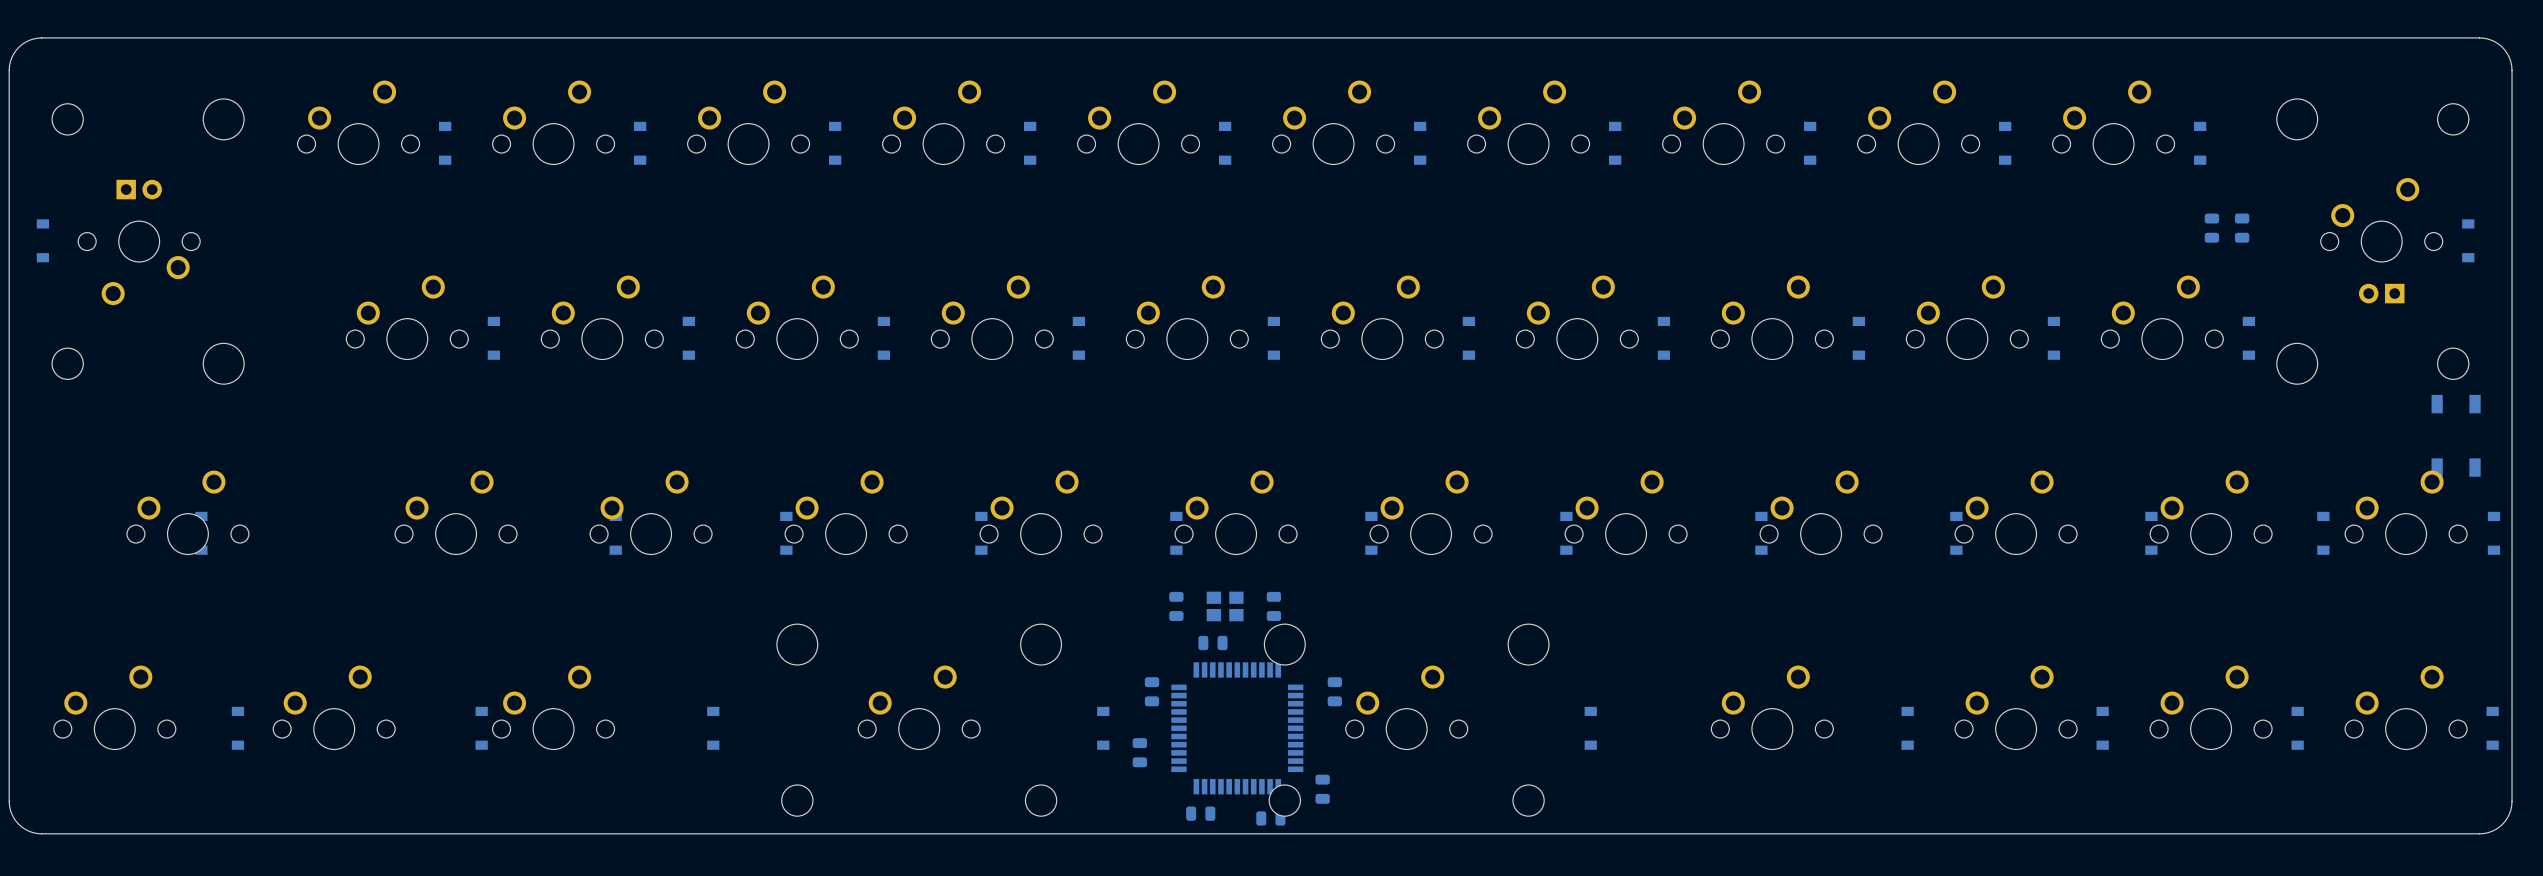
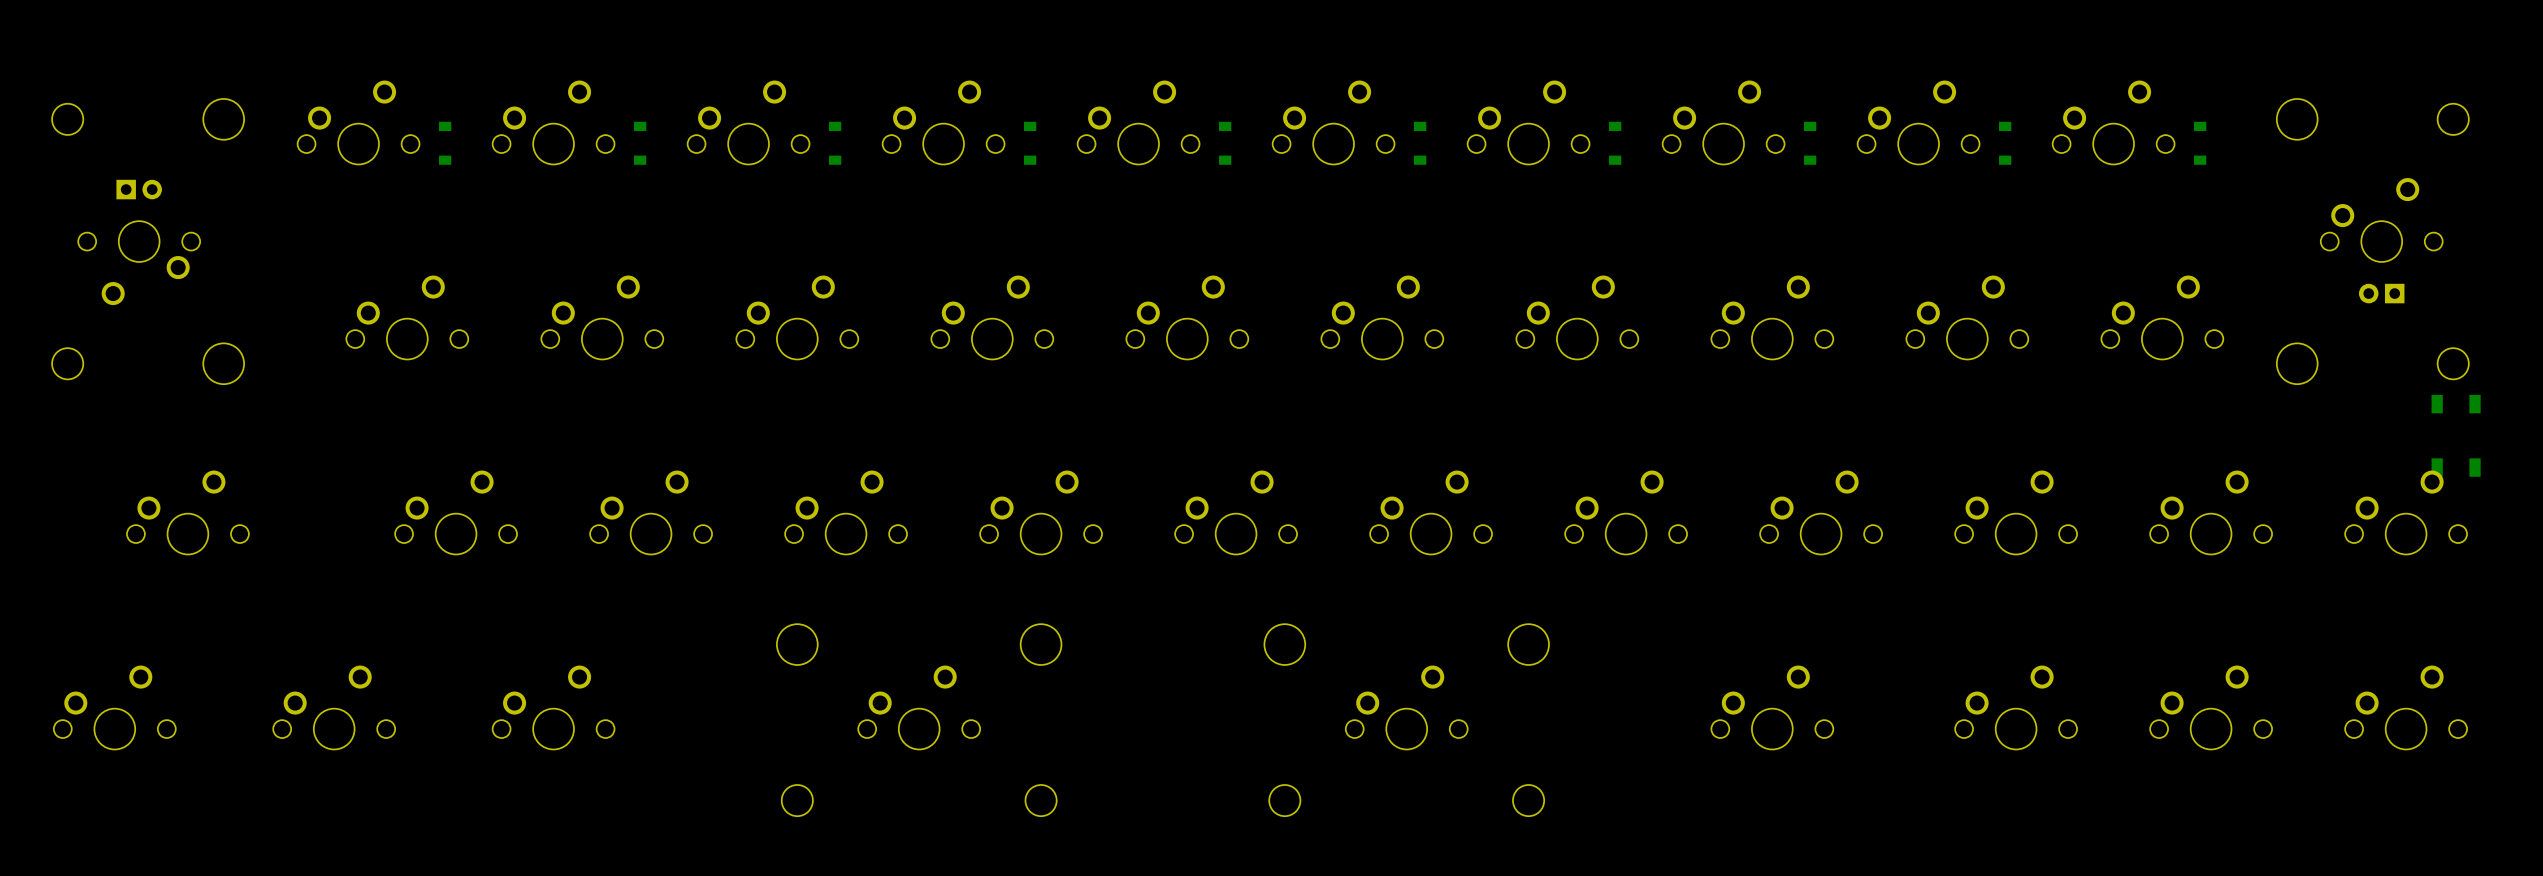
board edge: (41, 37) (29, 40) (18, 47) (11, 57) (9, 70) (9, 801) (11, 813) (15, 821) (21, 827) (33, 832) (2479, 833) (2487, 832) (2499, 827) (2507, 817) (2510, 809) (2512, 70) (2509, 57) (2505, 50) (2495, 42) (2487, 39) (41, 37) -> none
part: (2211, 228) -> none
part: (2242, 228) -> none
part: (42, 240) -> none
part: (2468, 240) -> none
part: (493, 338) -> none
part: (688, 338) -> none
part: (883, 338) -> none
part: (1078, 338) -> none
part: (1273, 338) -> none
part: (1468, 338) -> none
part: (1663, 338) -> none
part: (1858, 338) -> none
part: (2053, 338) -> none
part: (2248, 338) -> none
part: (201, 533) -> none
part: (615, 533) -> none
part: (786, 533) -> none
part: (981, 533) -> none
part: (1176, 533) -> none
part: (1371, 533) -> none
part: (1566, 533) -> none
part: (1761, 533) -> none
part: (1956, 533) -> none
part: (2151, 533) -> none
part: (2323, 533) -> none
part: (2493, 533) -> none
part: (1176, 606) -> none
part: (1225, 606) -> none
part: (1273, 606) -> none
part: (1212, 643) -> none
part: (1152, 691) -> none
part: (1334, 691) -> none
part: (237, 728) -> none
part: (481, 728) -> none
part: (713, 728) -> none
part: (1103, 728) -> none
part: (1237, 728) -> none
part: (1590, 728) -> none
part: (1907, 728) -> none
part: (2102, 728) -> none
part: (2297, 728) -> none
part: (2492, 728) -> none
part: (1139, 752) -> none
part: (1322, 789) -> none
part: (1200, 813) -> none
part: (1270, 818) -> none

